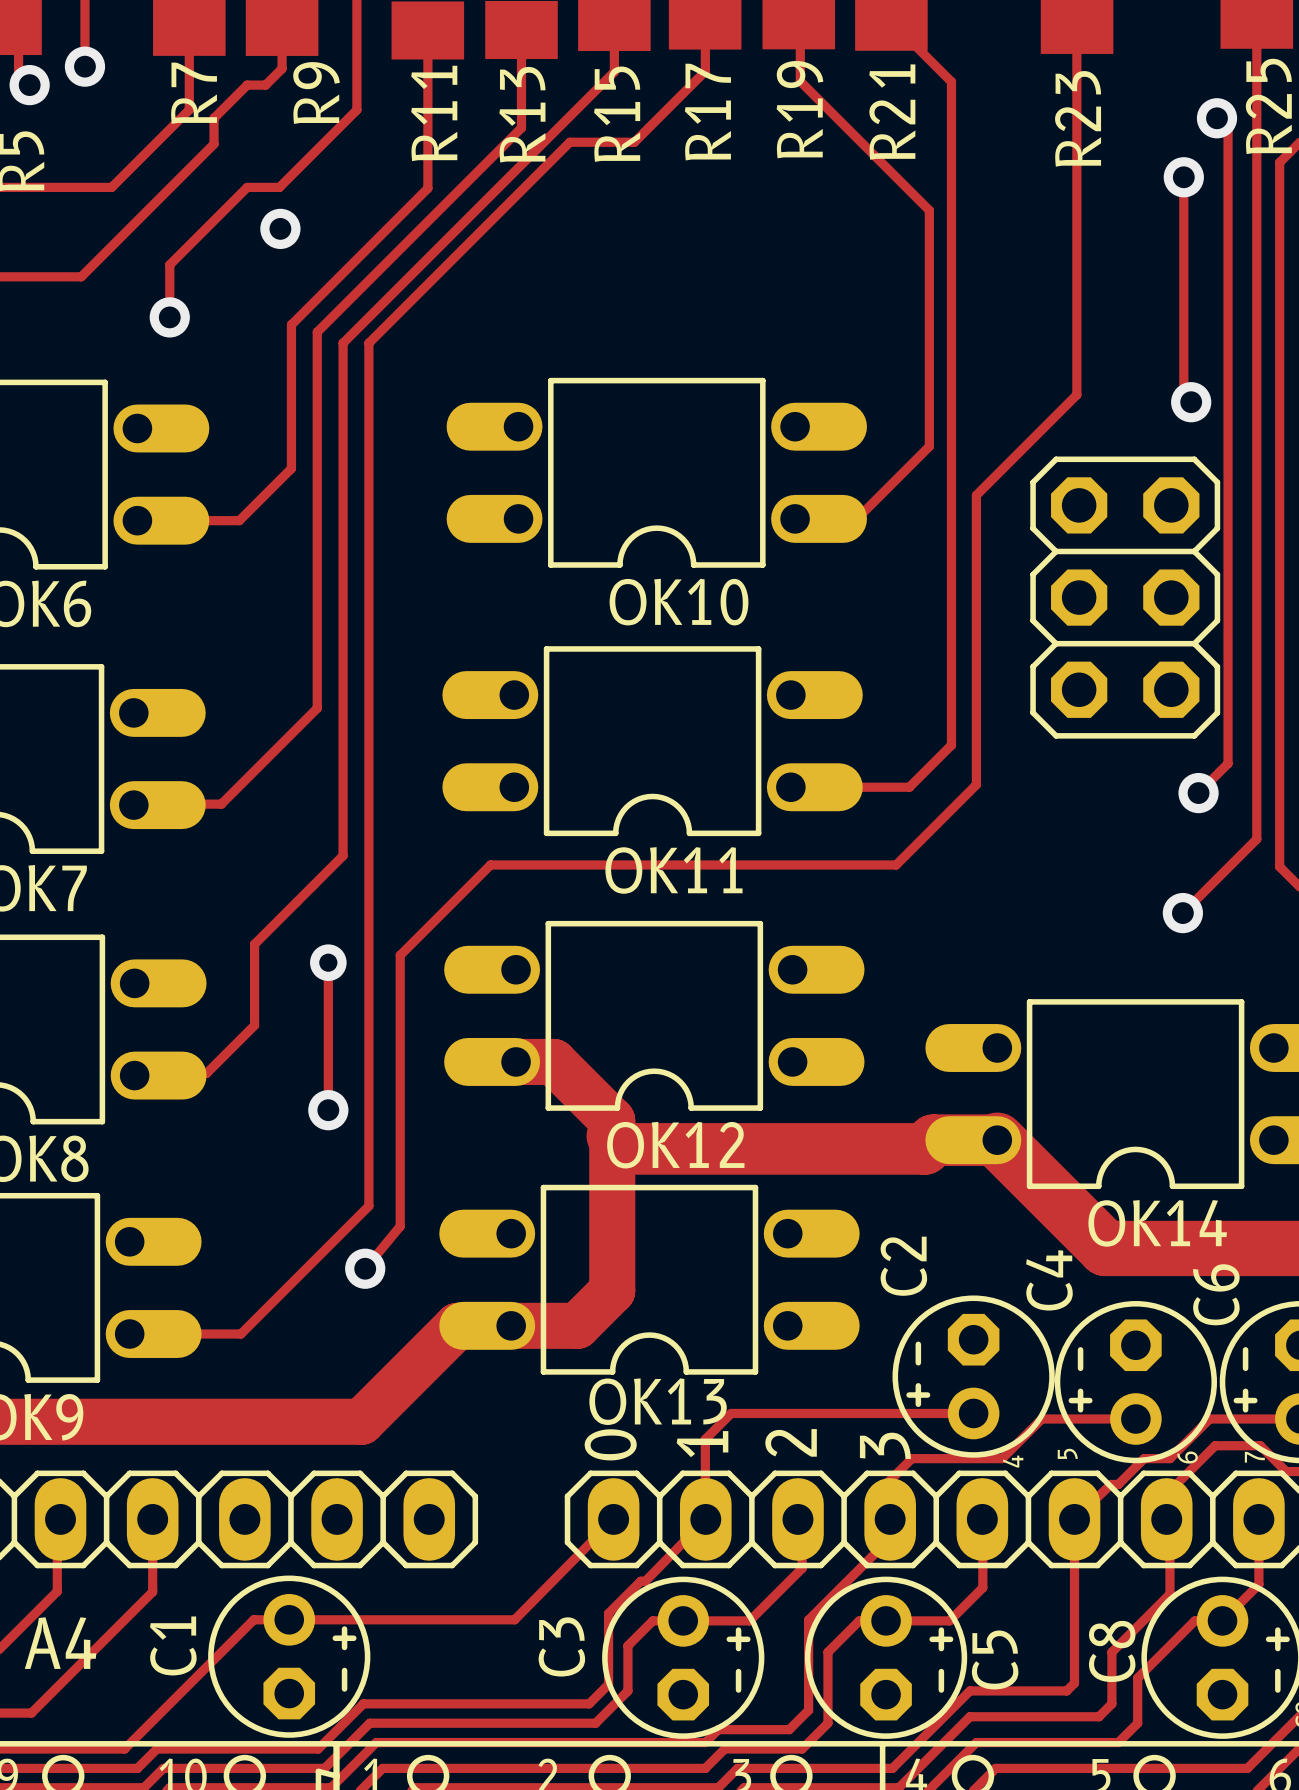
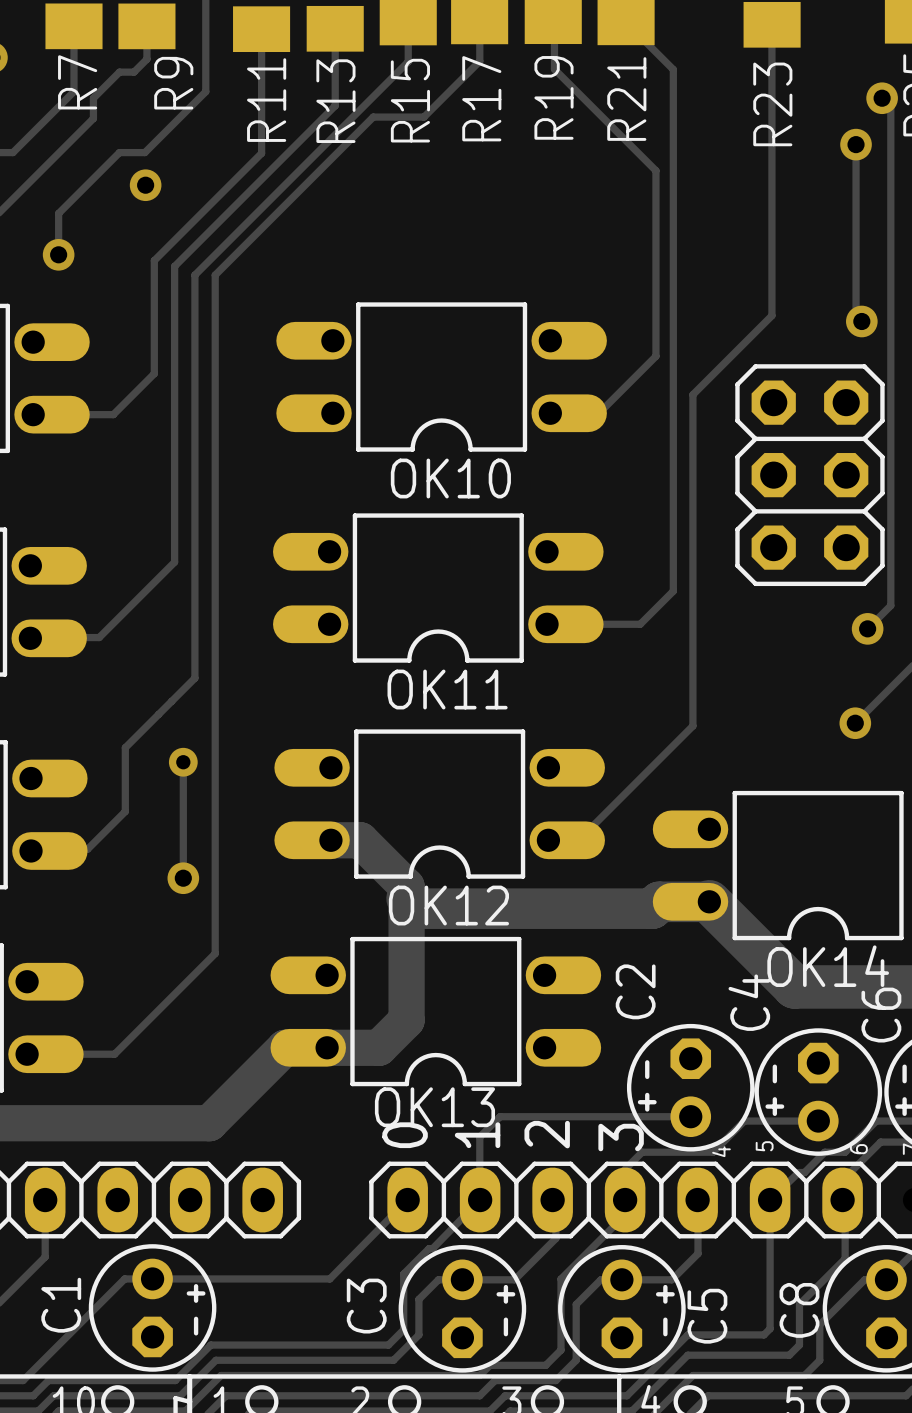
track: (976, 784) (896, 864) (490, 864) (400, 955) (400, 1226) (365, 1268) -> (692, 622) (692, 725) (578, 840) (548, 840)
via: (365, 1268) -> none

